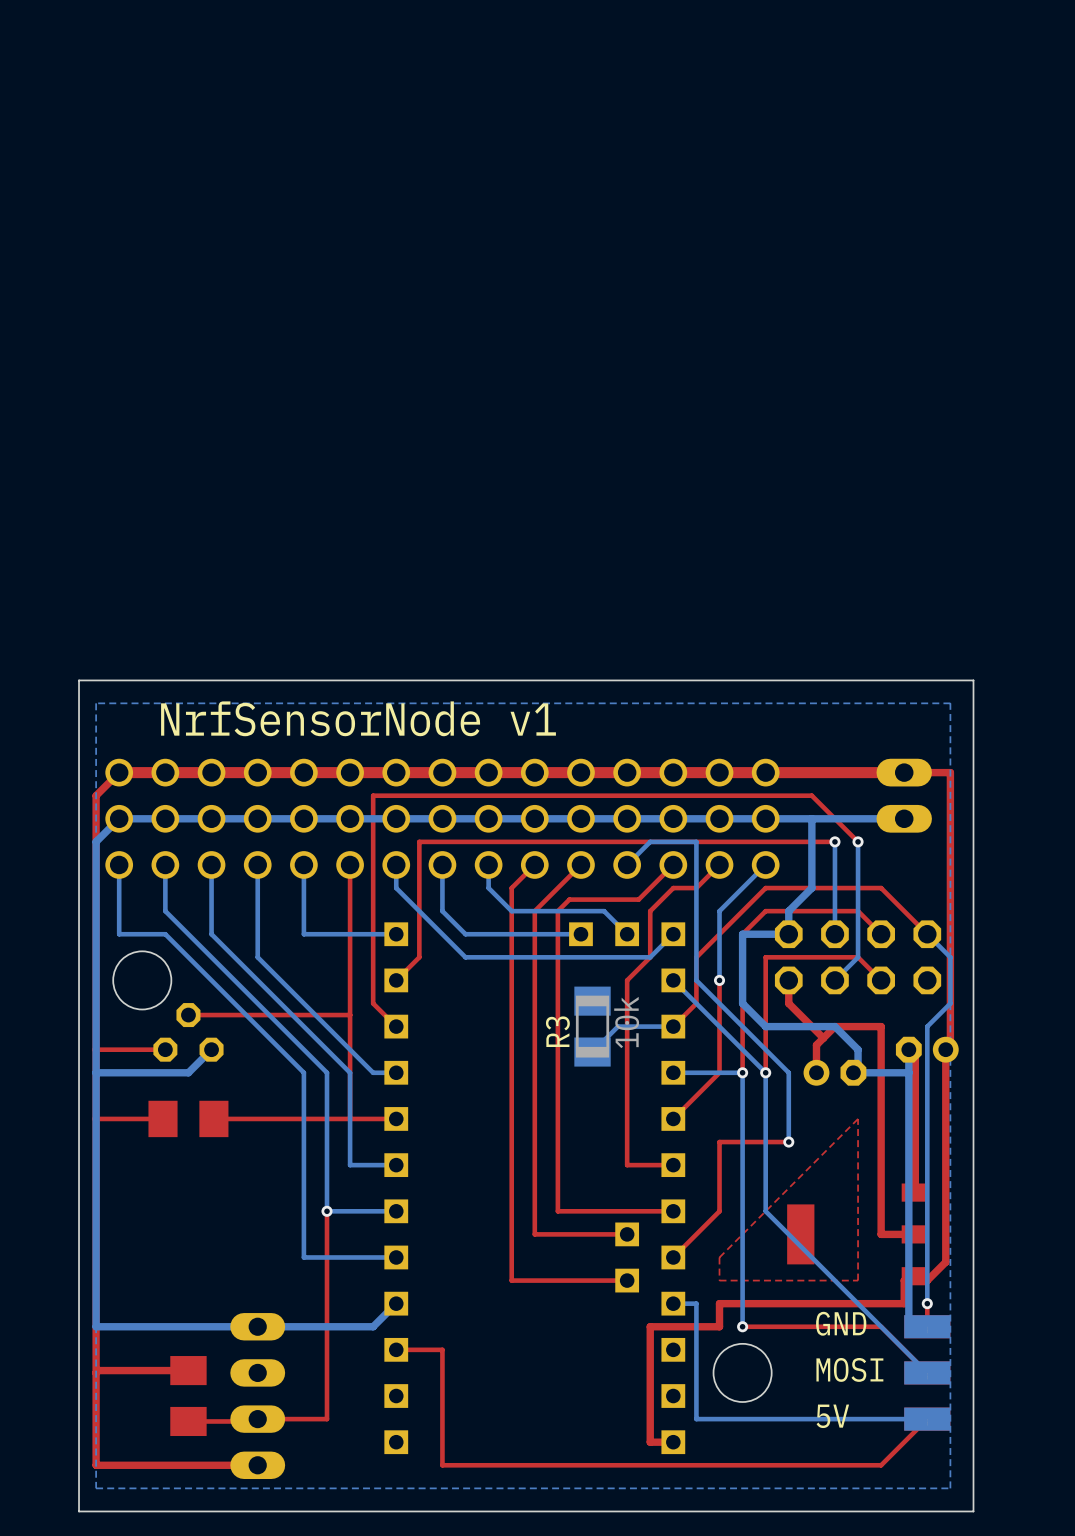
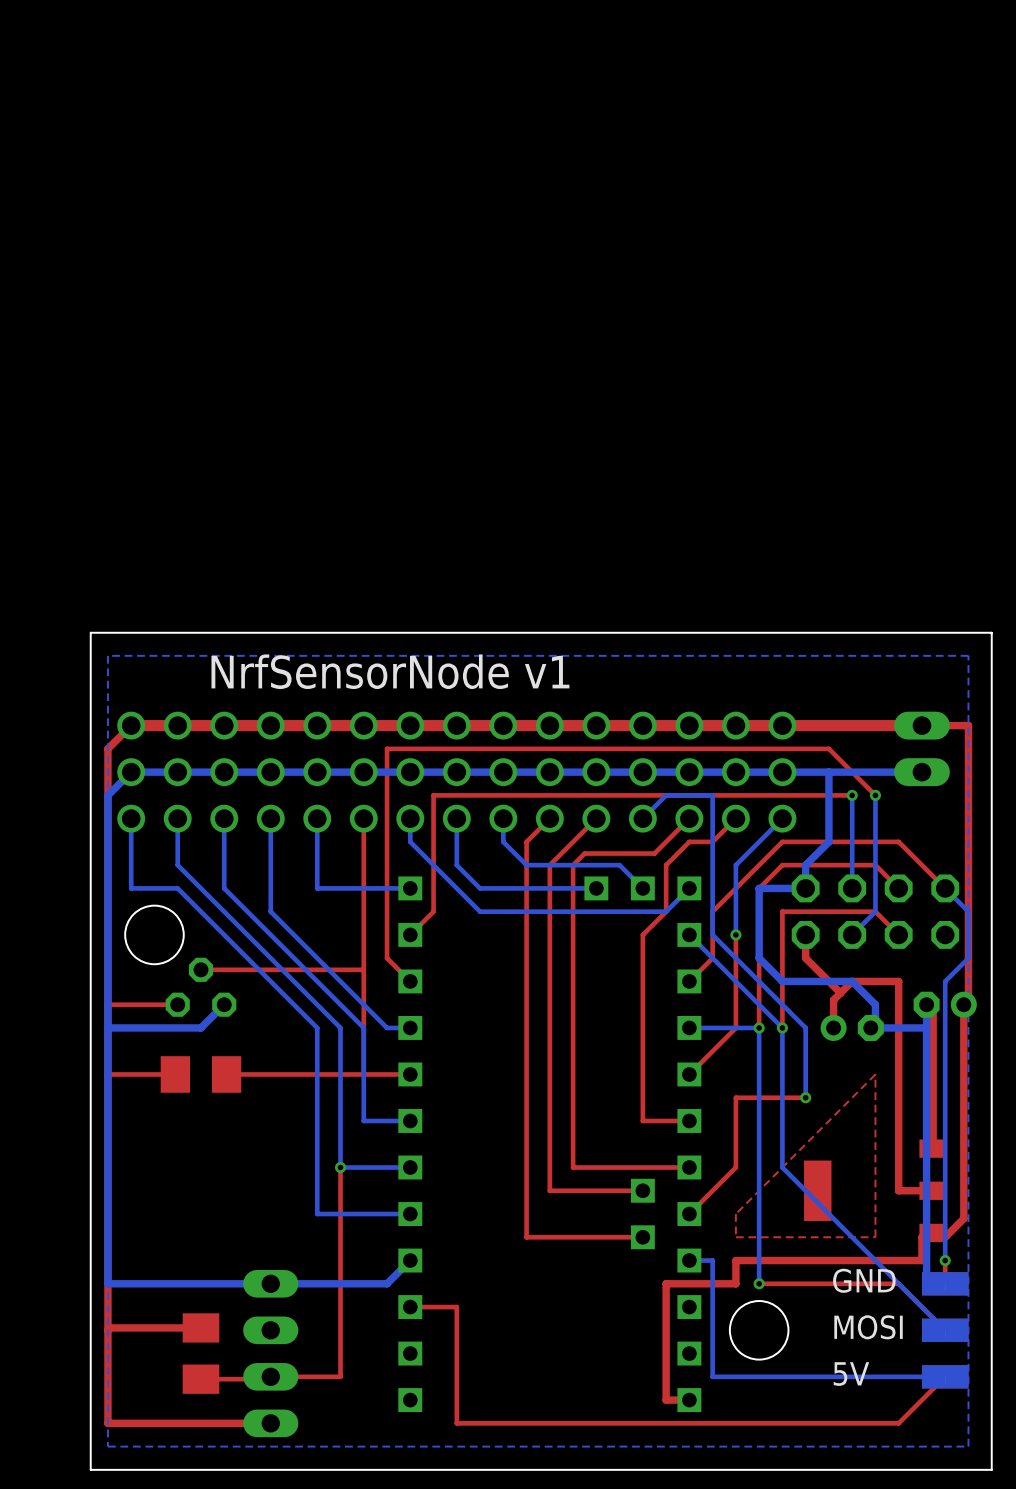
R3: 10k (592, 1026) -> none
bottom track: (673, 1026) (617, 1026) (592, 1052) -> none

